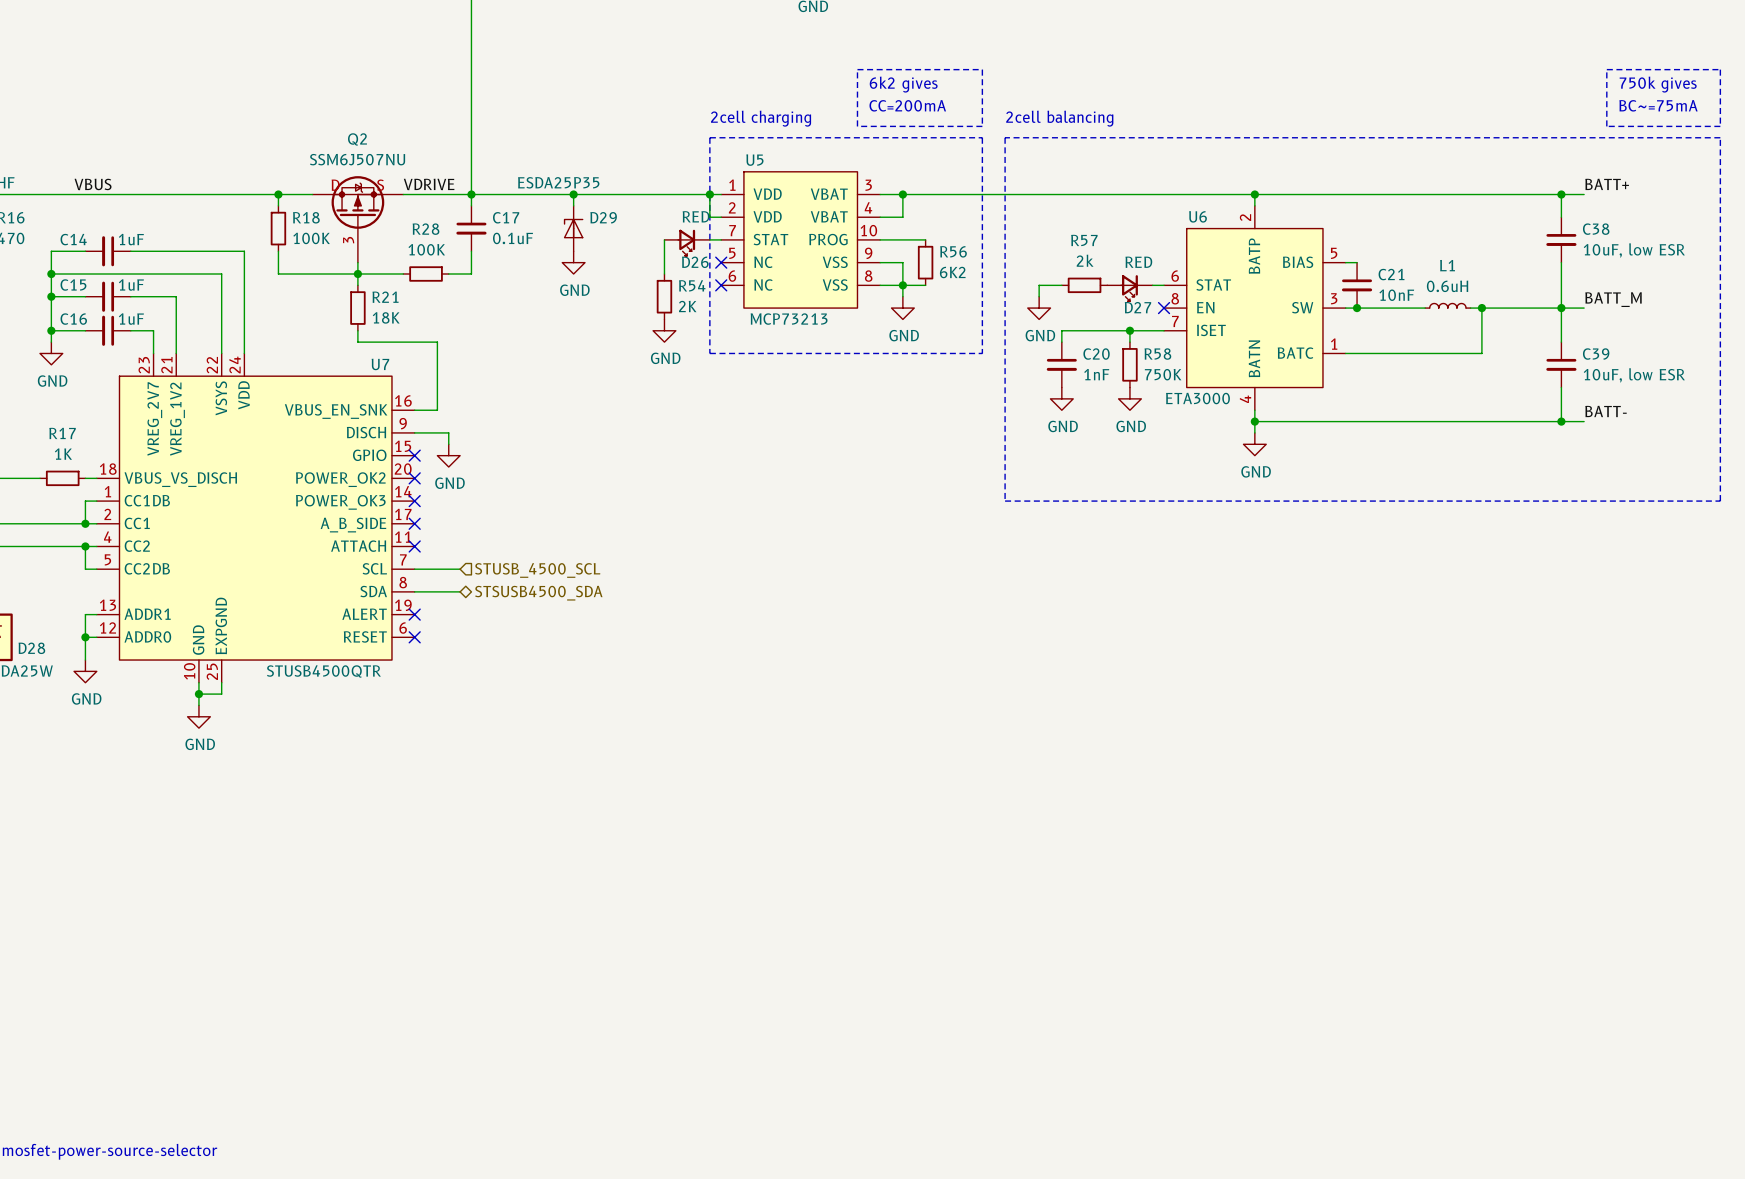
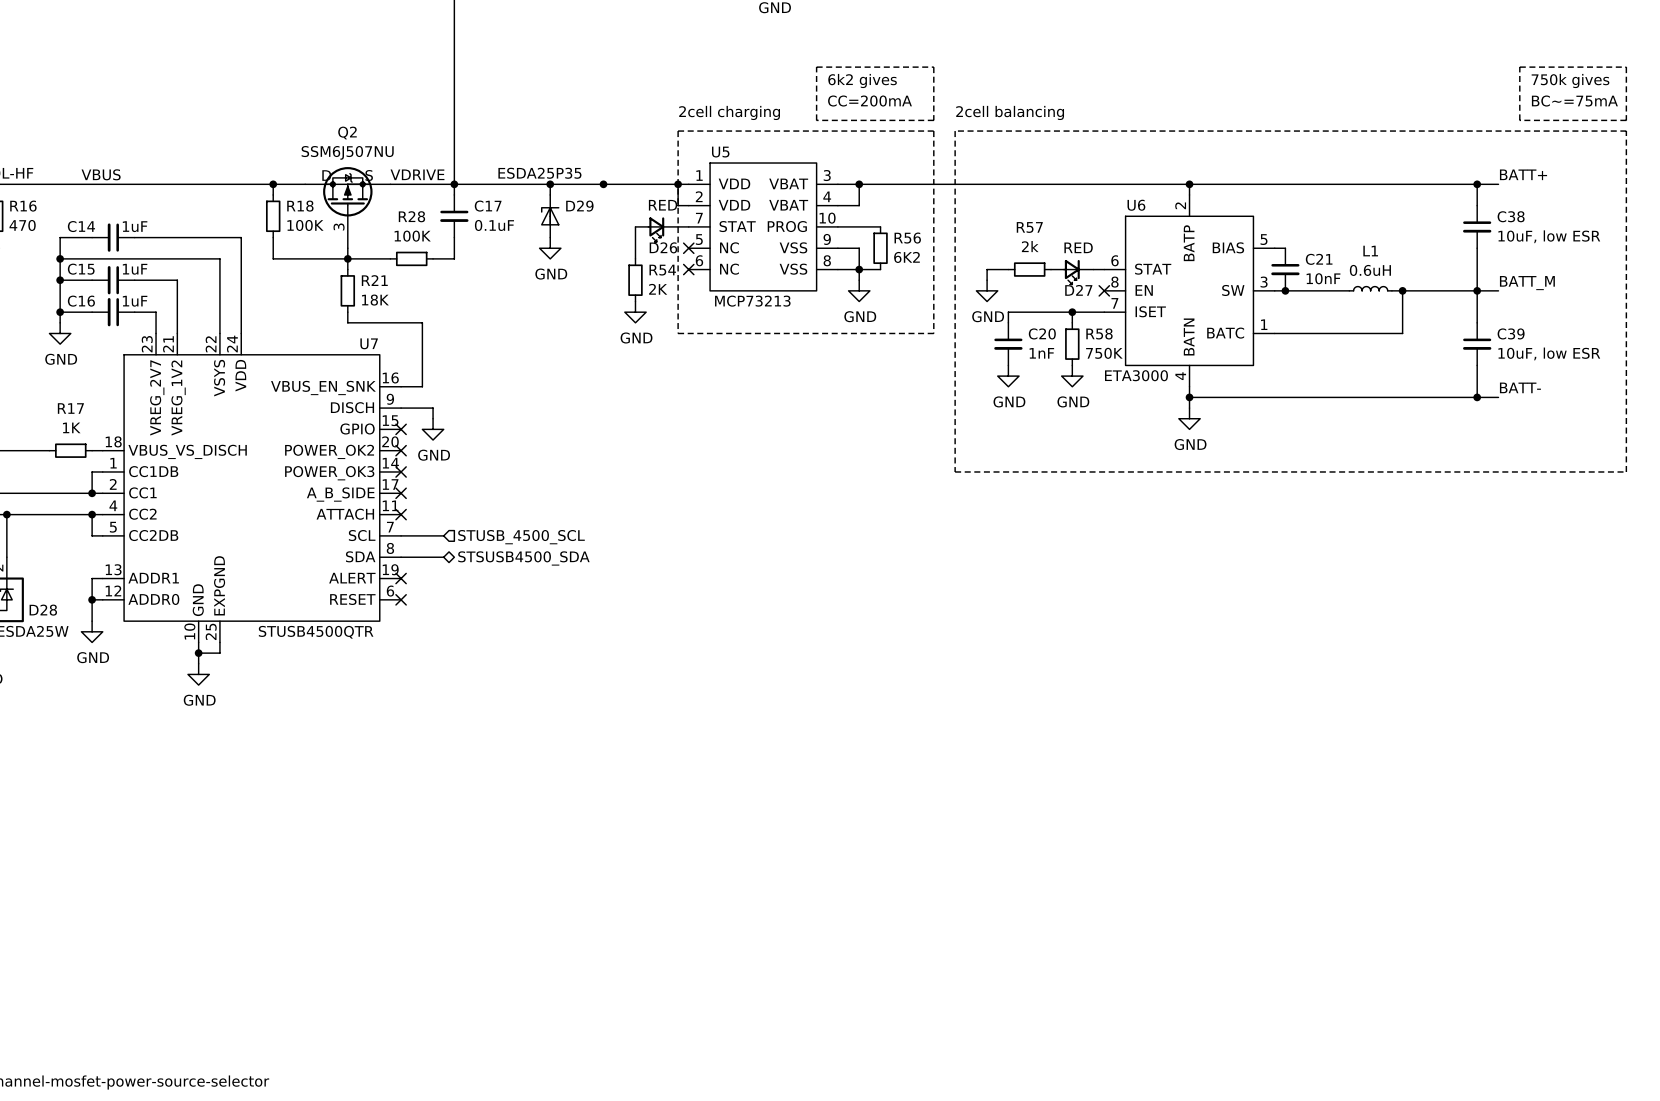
junction: none -> (603, 184)

